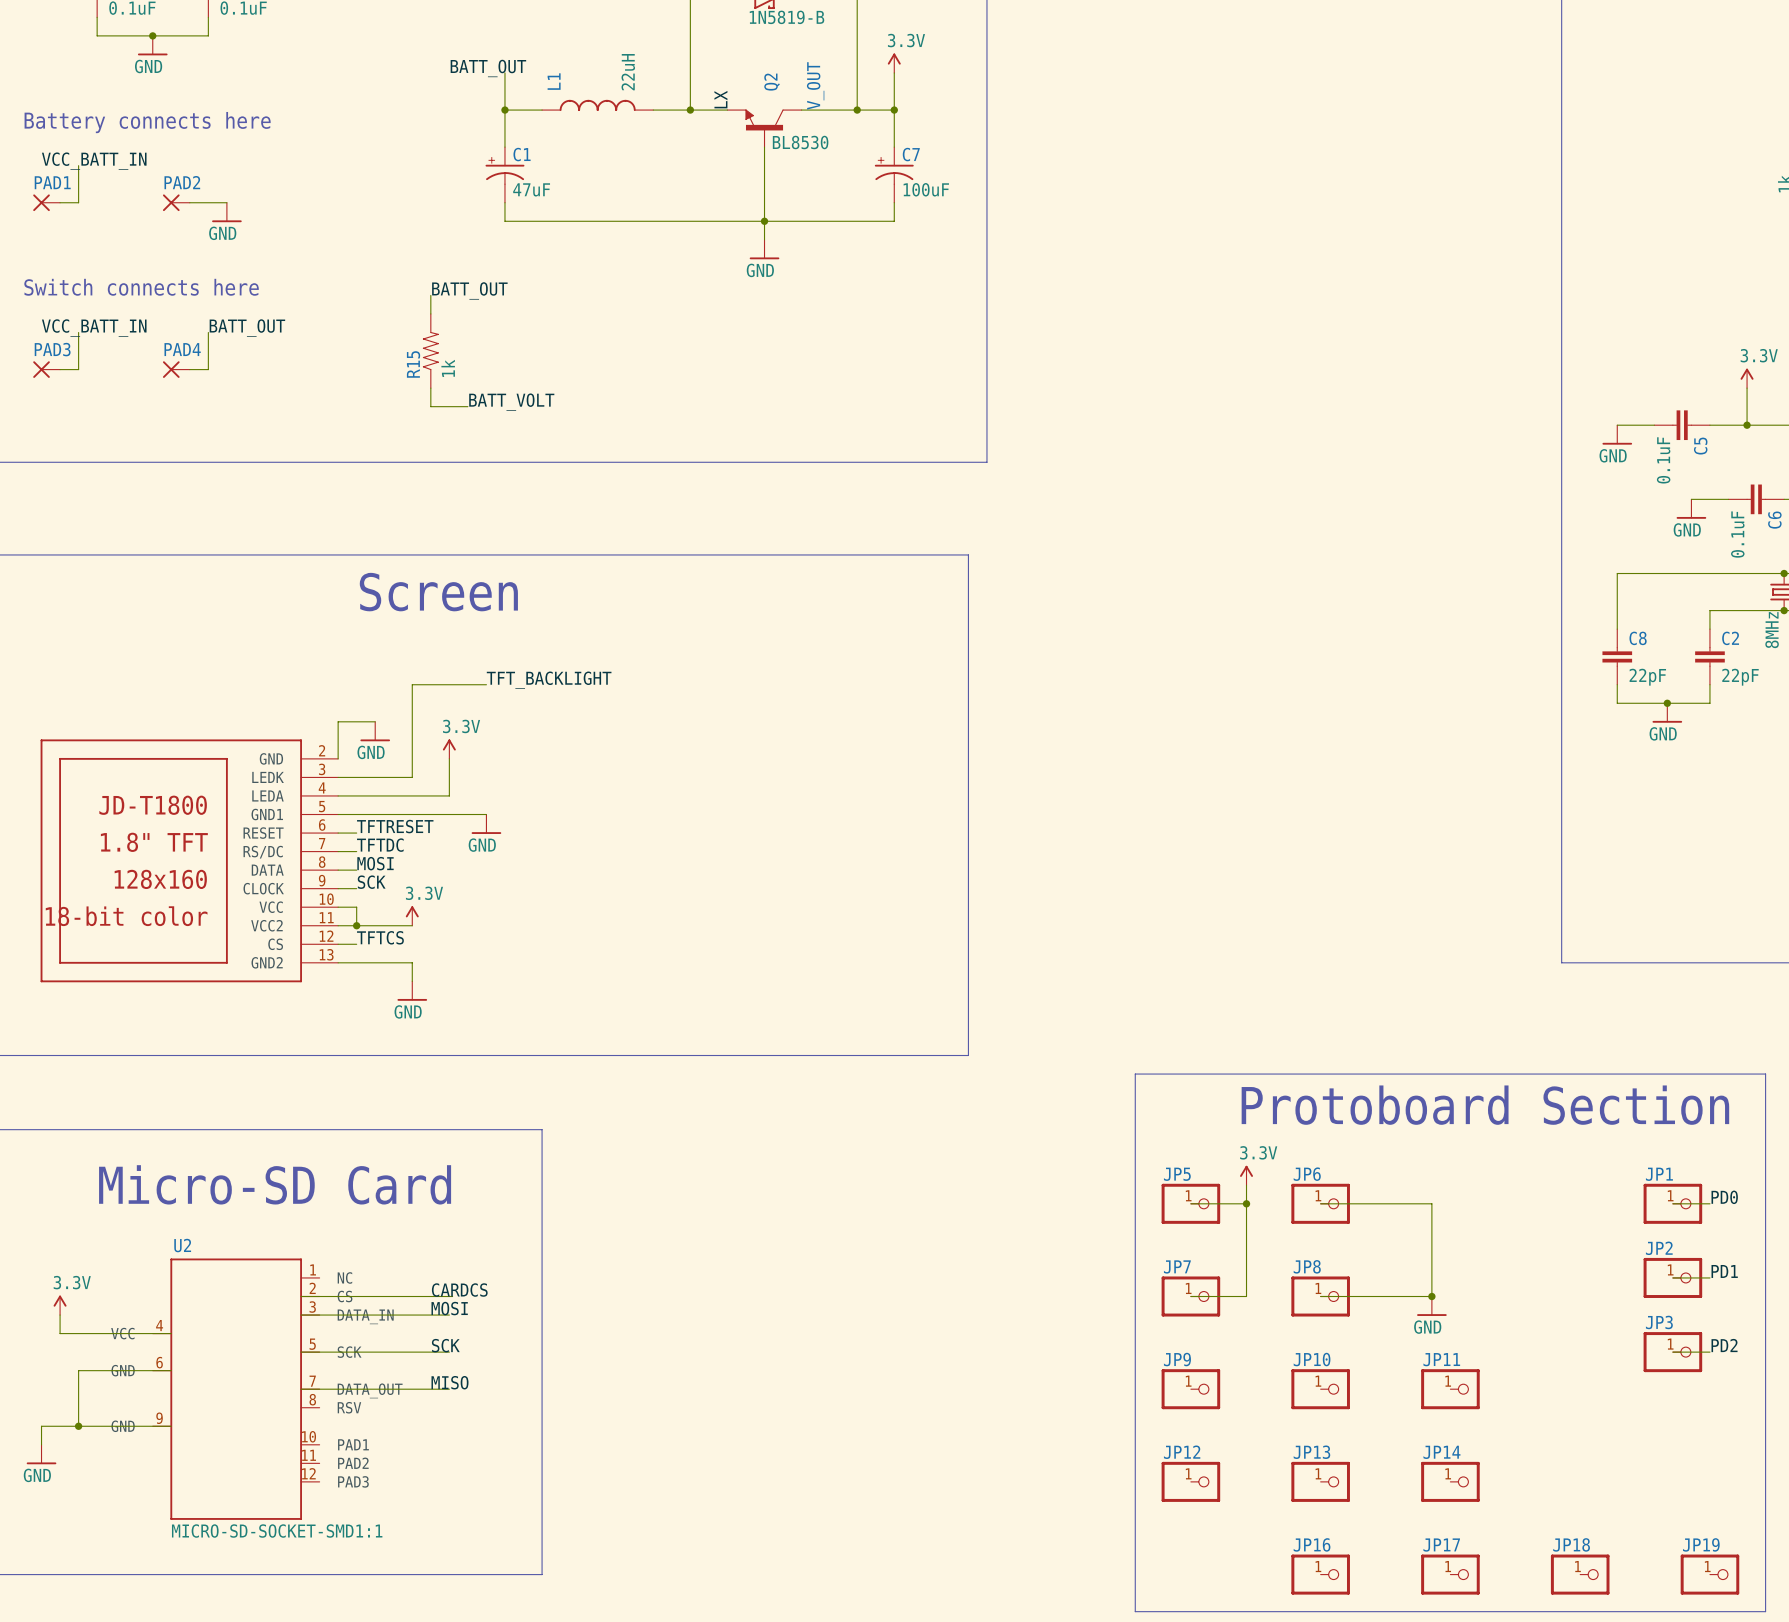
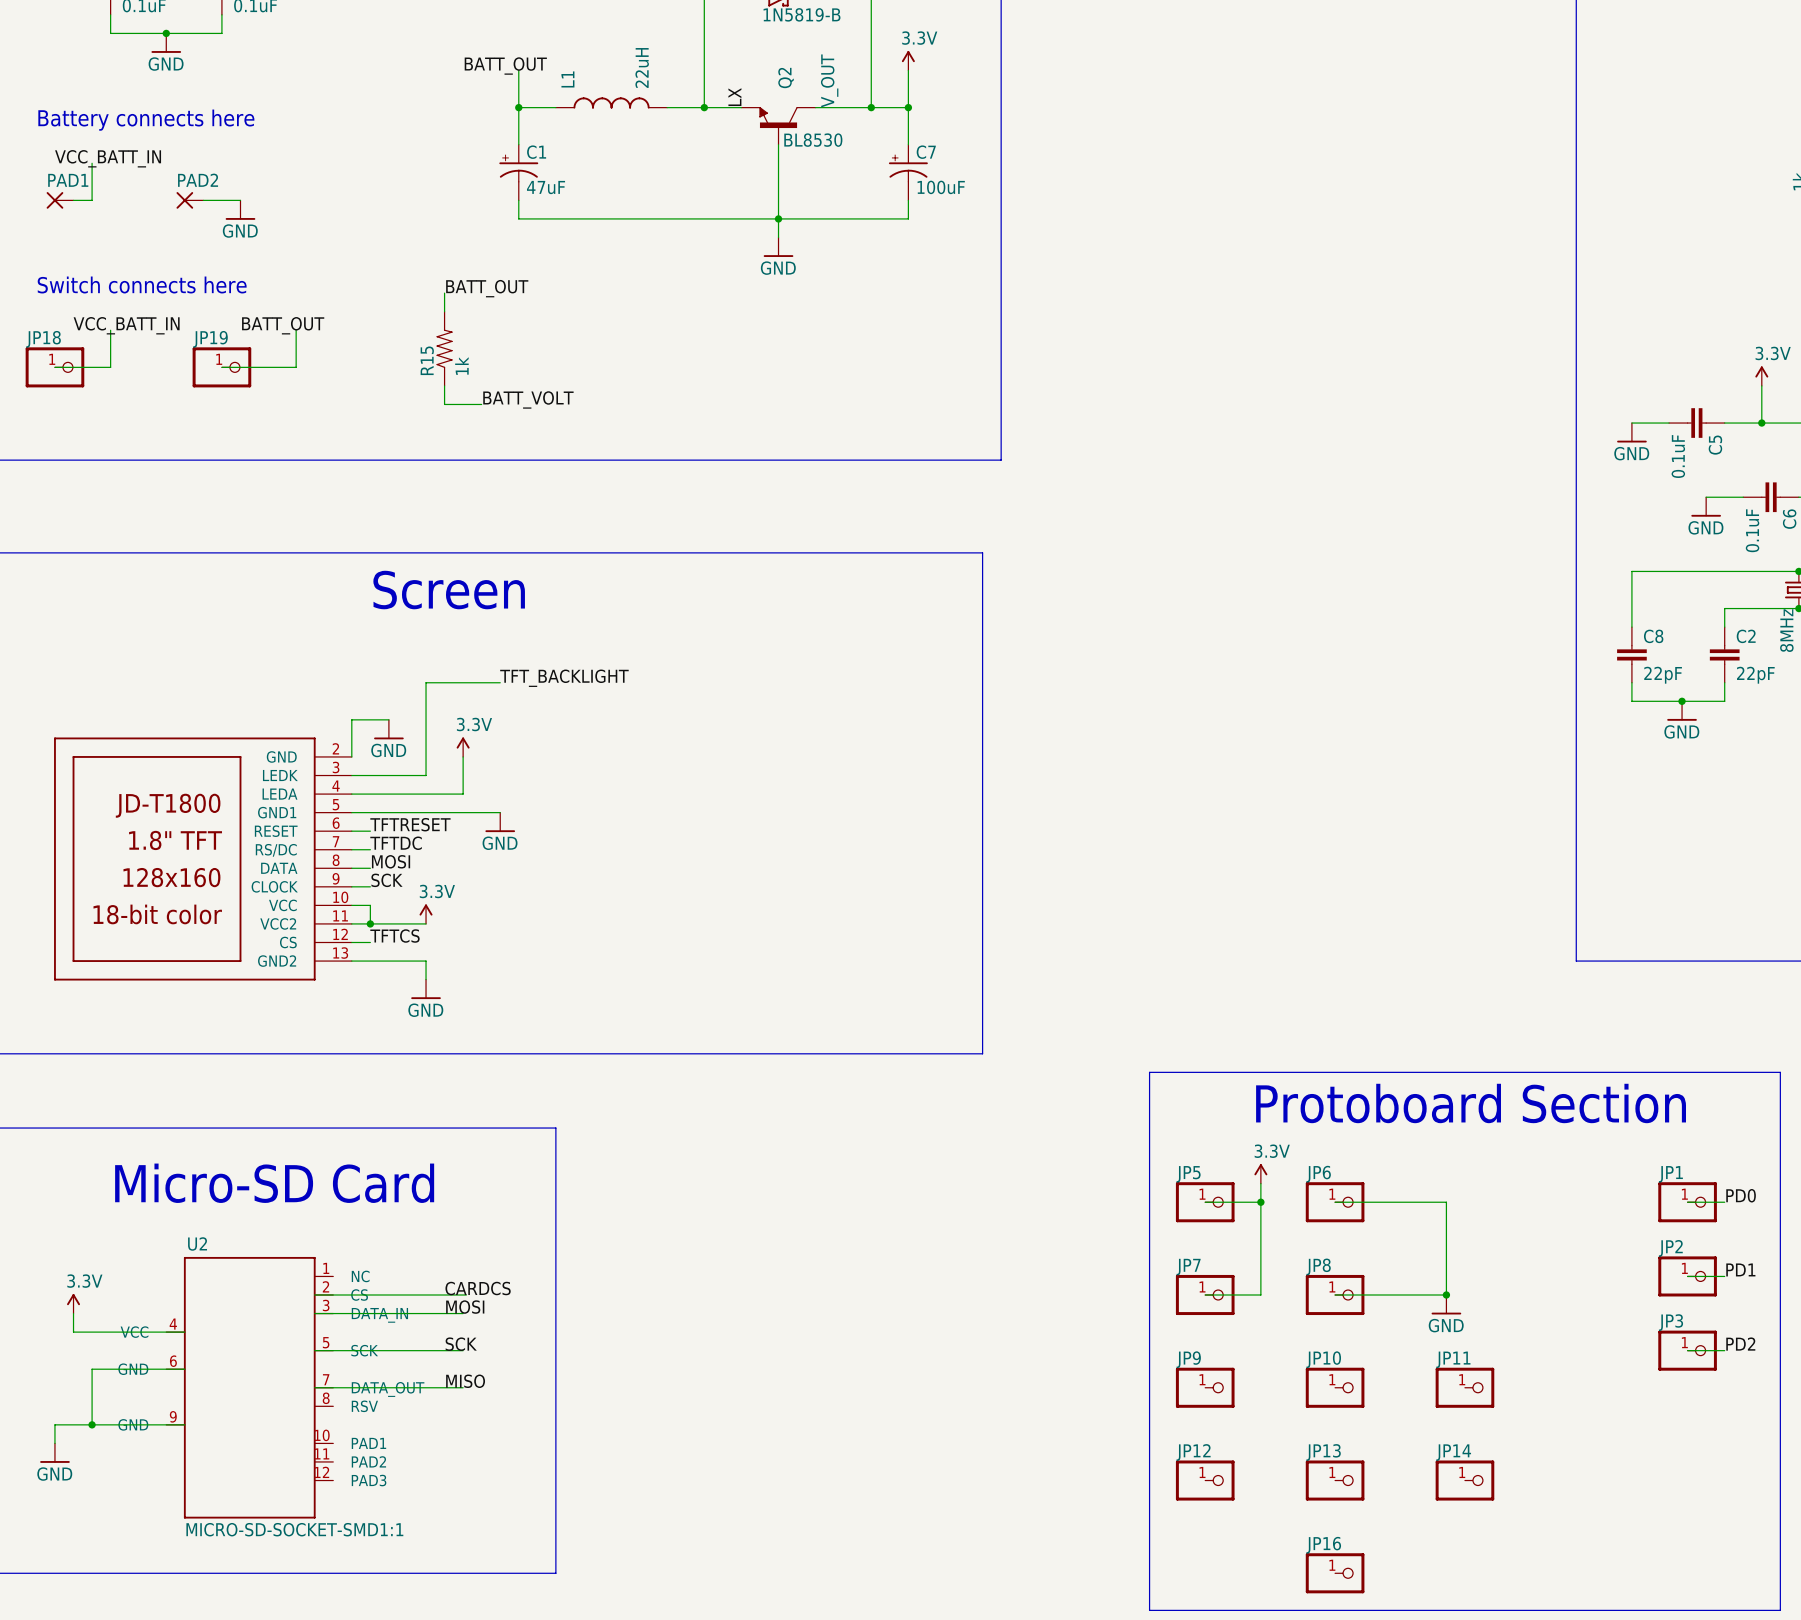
label position: VCC_BATT_IN (94, 328) -> VCC_BATT_IN (126, 325)
label position: BATT_OUT (247, 328) -> BATT_OUT (283, 325)
wire: (78, 332) (78, 369) -> (110, 330) (110, 367) (92, 367)
wire: (208, 332) (208, 369) (189, 369) -> none
wire: none -> (296, 330) (296, 367) (221, 367)
PAD3: (46, 369) -> none
PAD4: (176, 369) -> none
JP17: (1450, 1574) -> none
JP18 position: (1580, 1574) -> (54, 367)
JP19 position: (1709, 1574) -> (221, 367)

